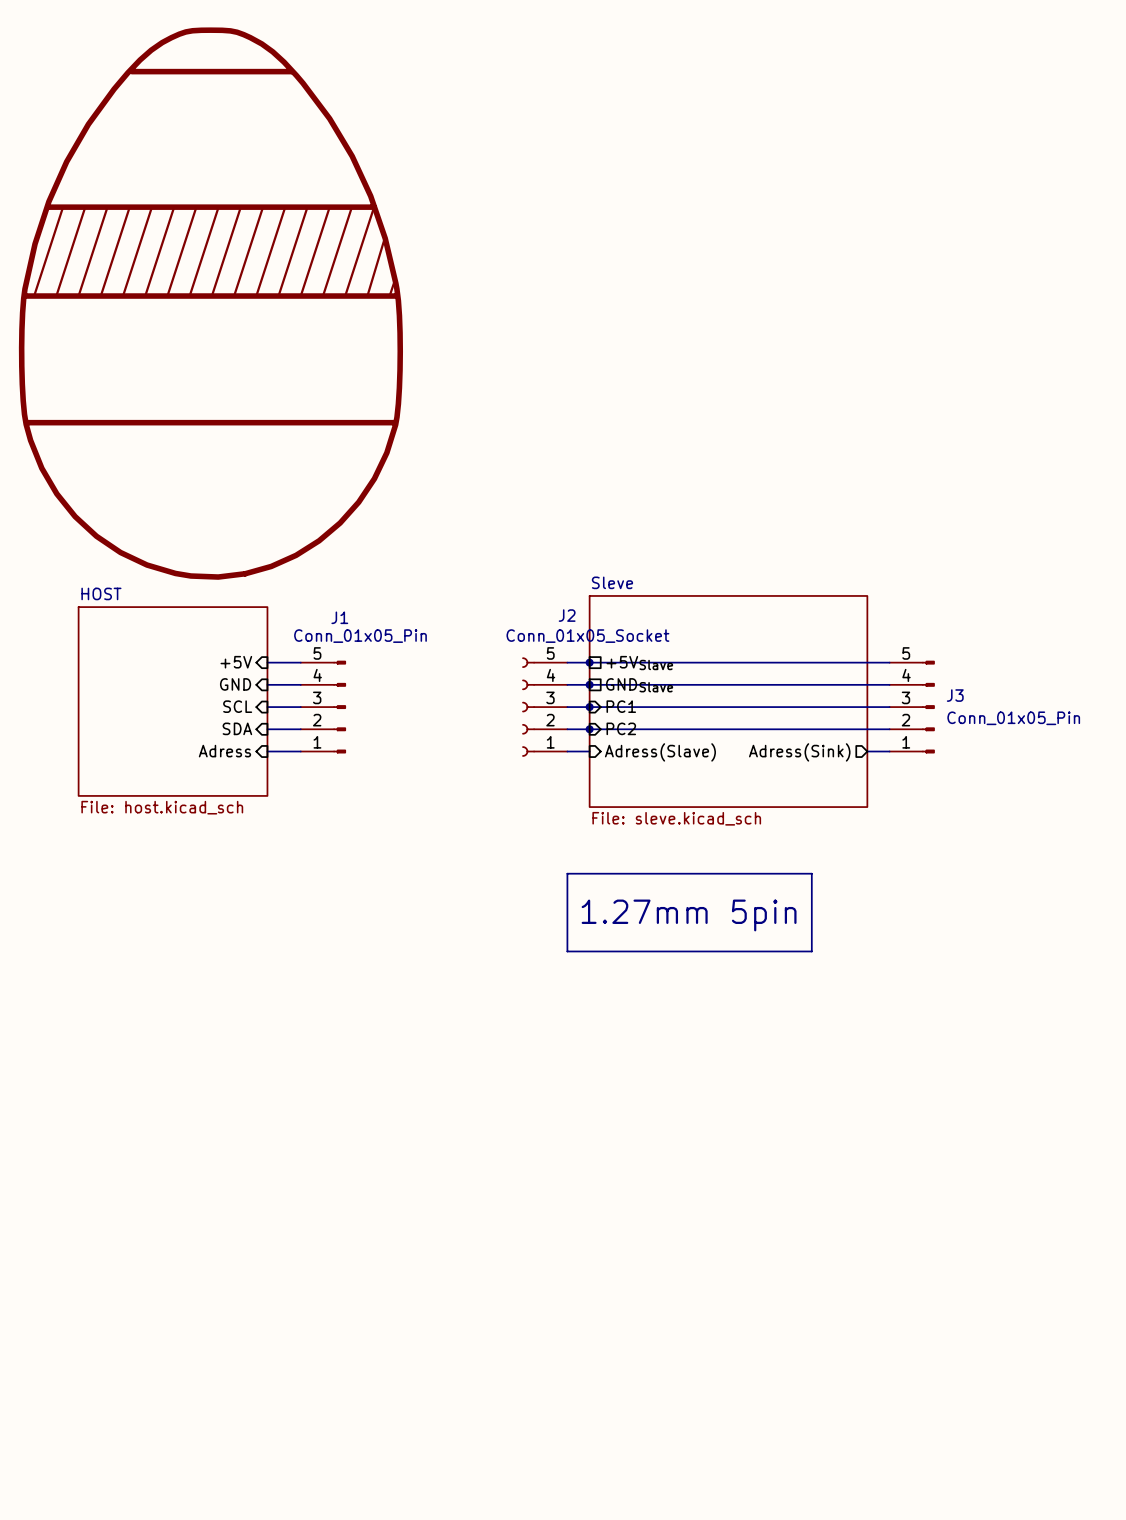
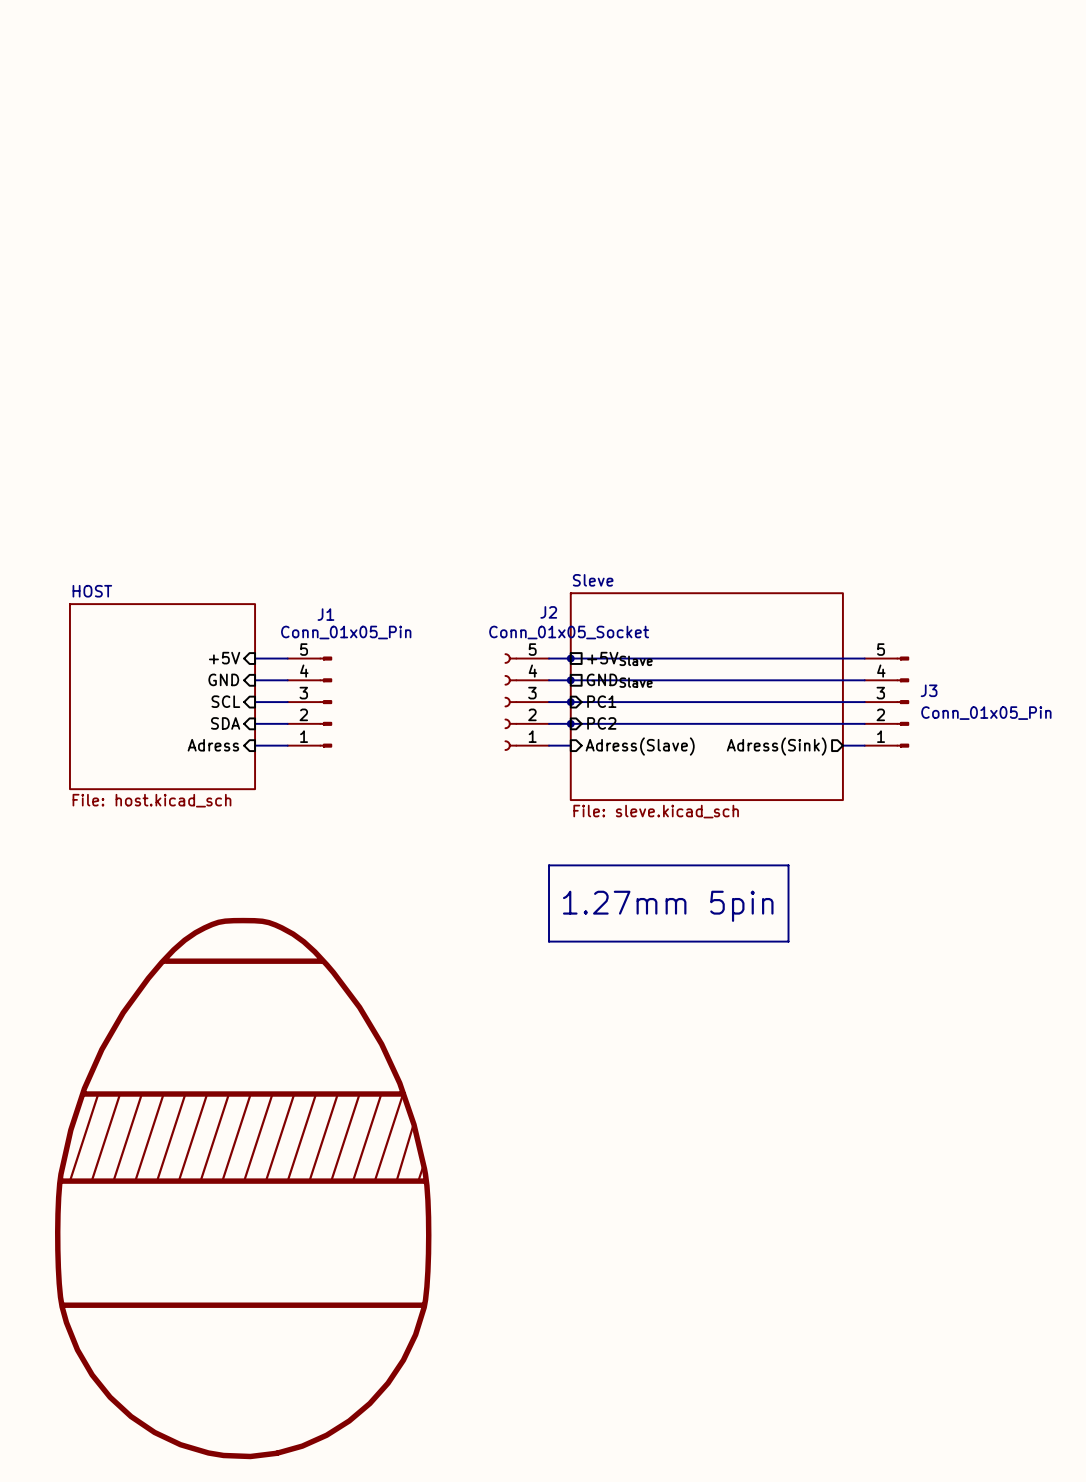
part: (210, 303) -> none
part: none -> (243, 1188)

